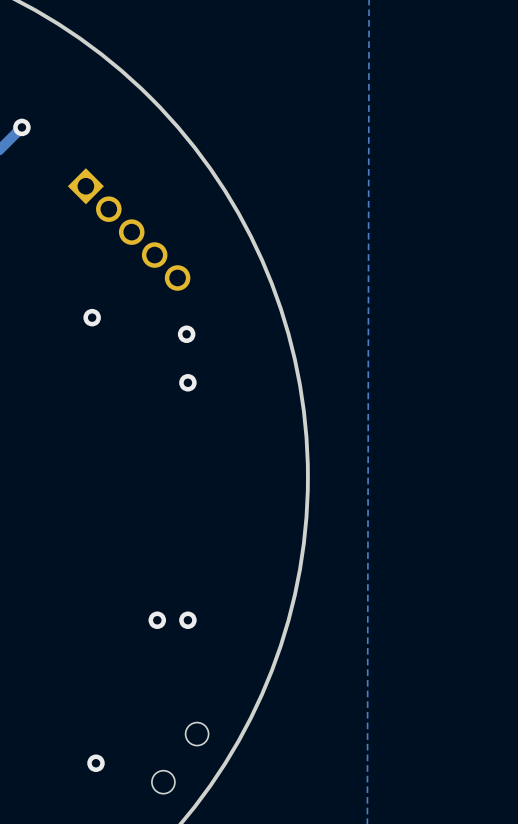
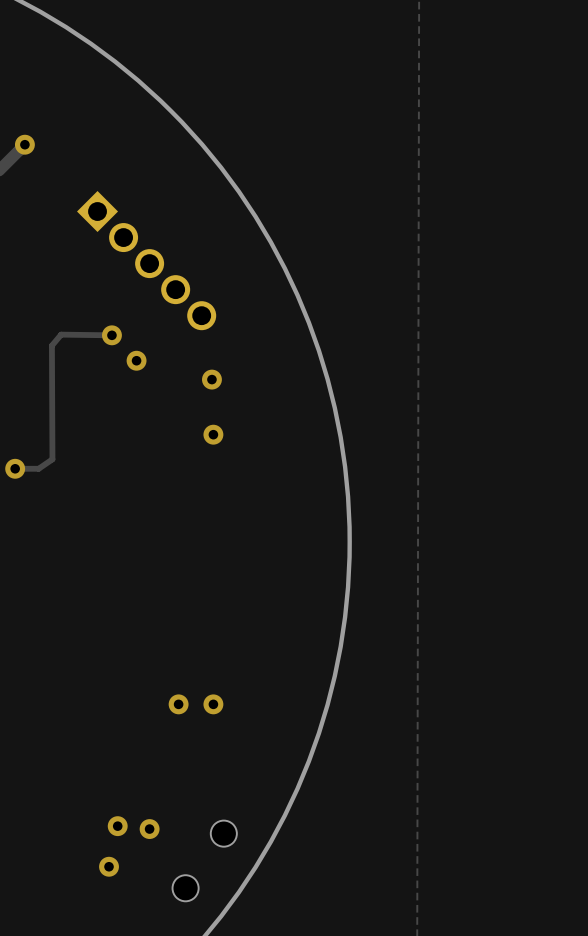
track: none -> (111, 335) (61, 334) (51, 345) (52, 459) (38, 468) (15, 468)
via: none -> (111, 335)
via: (92, 317) -> none
via: none -> (136, 360)
via: none -> (15, 468)
via: none -> (117, 826)
via: none -> (149, 829)

